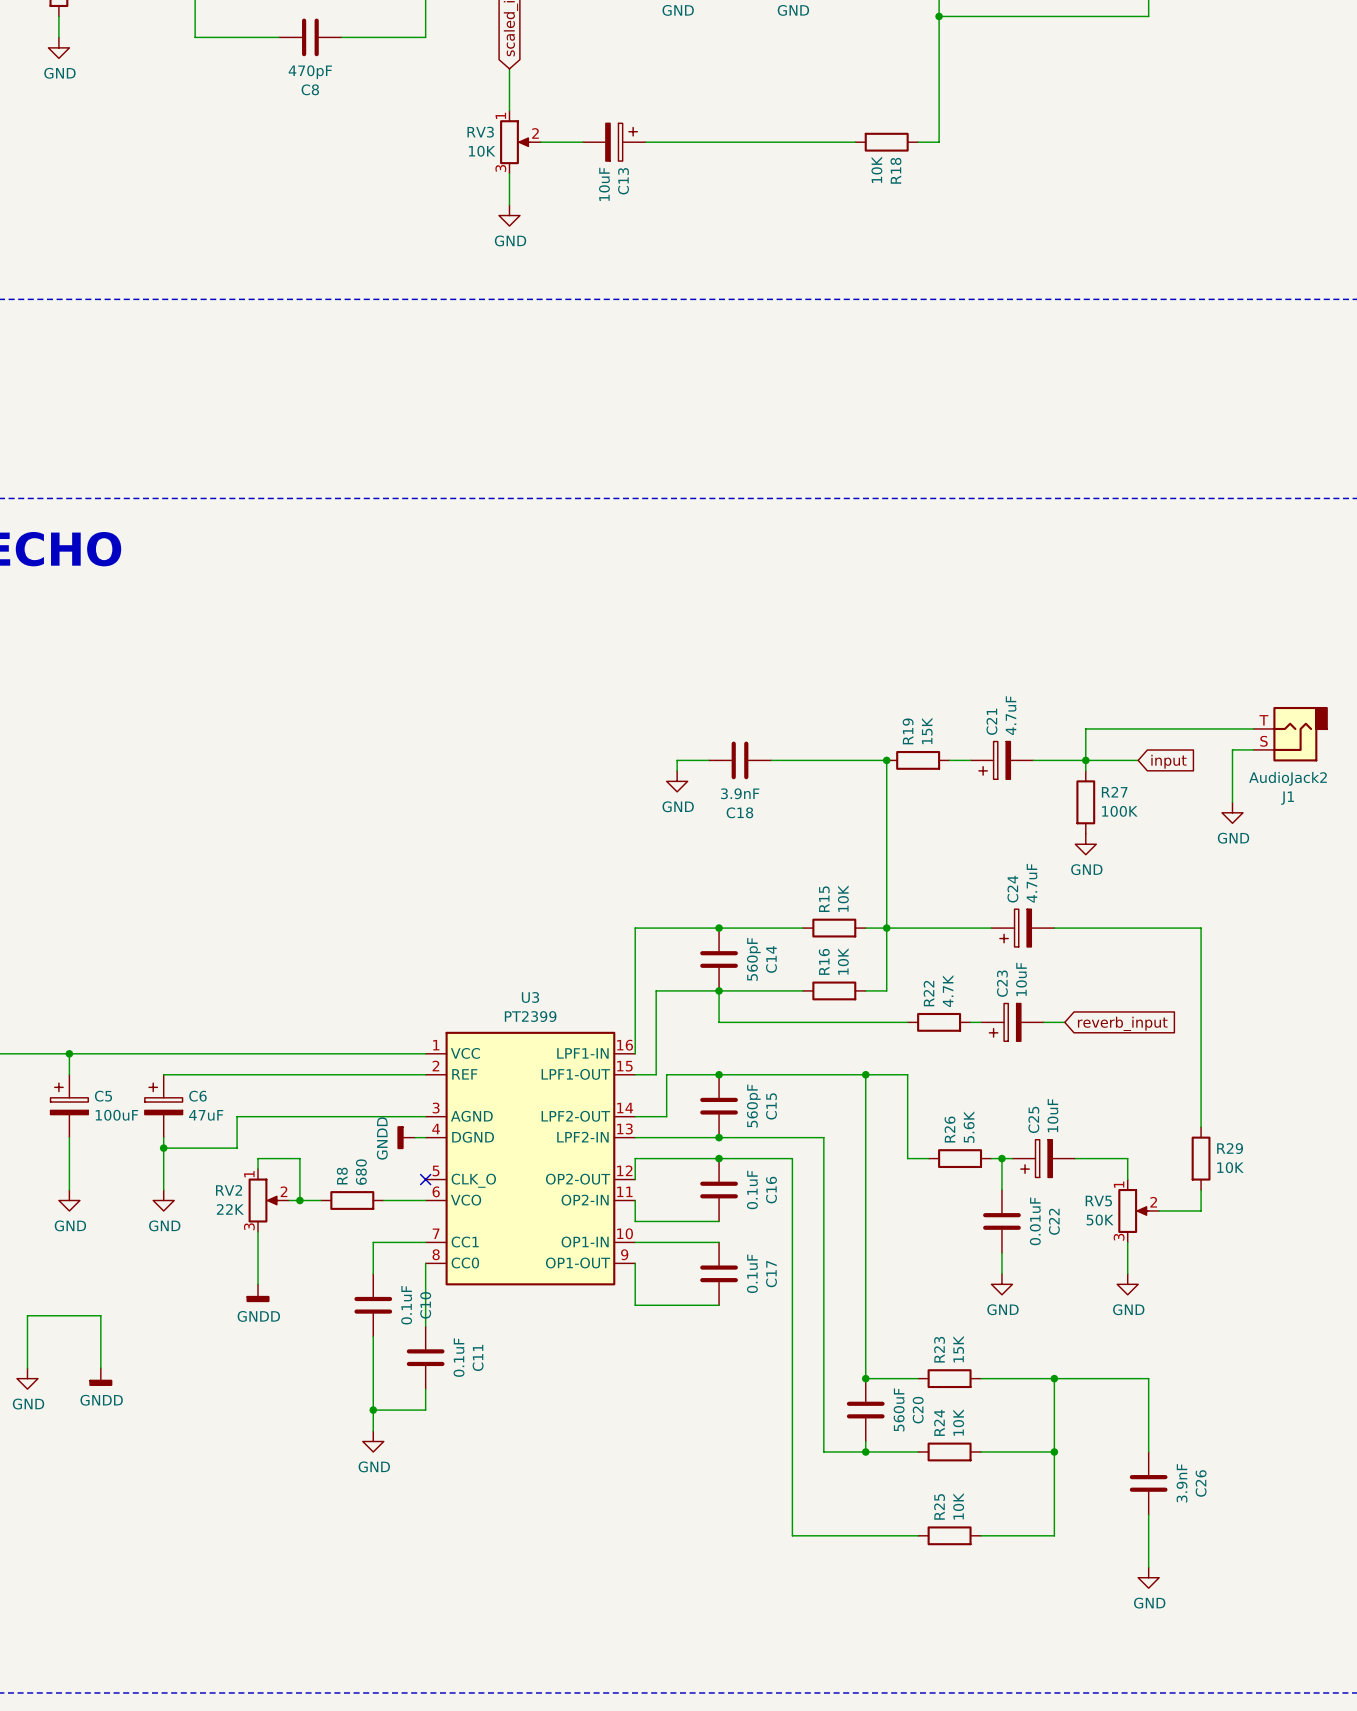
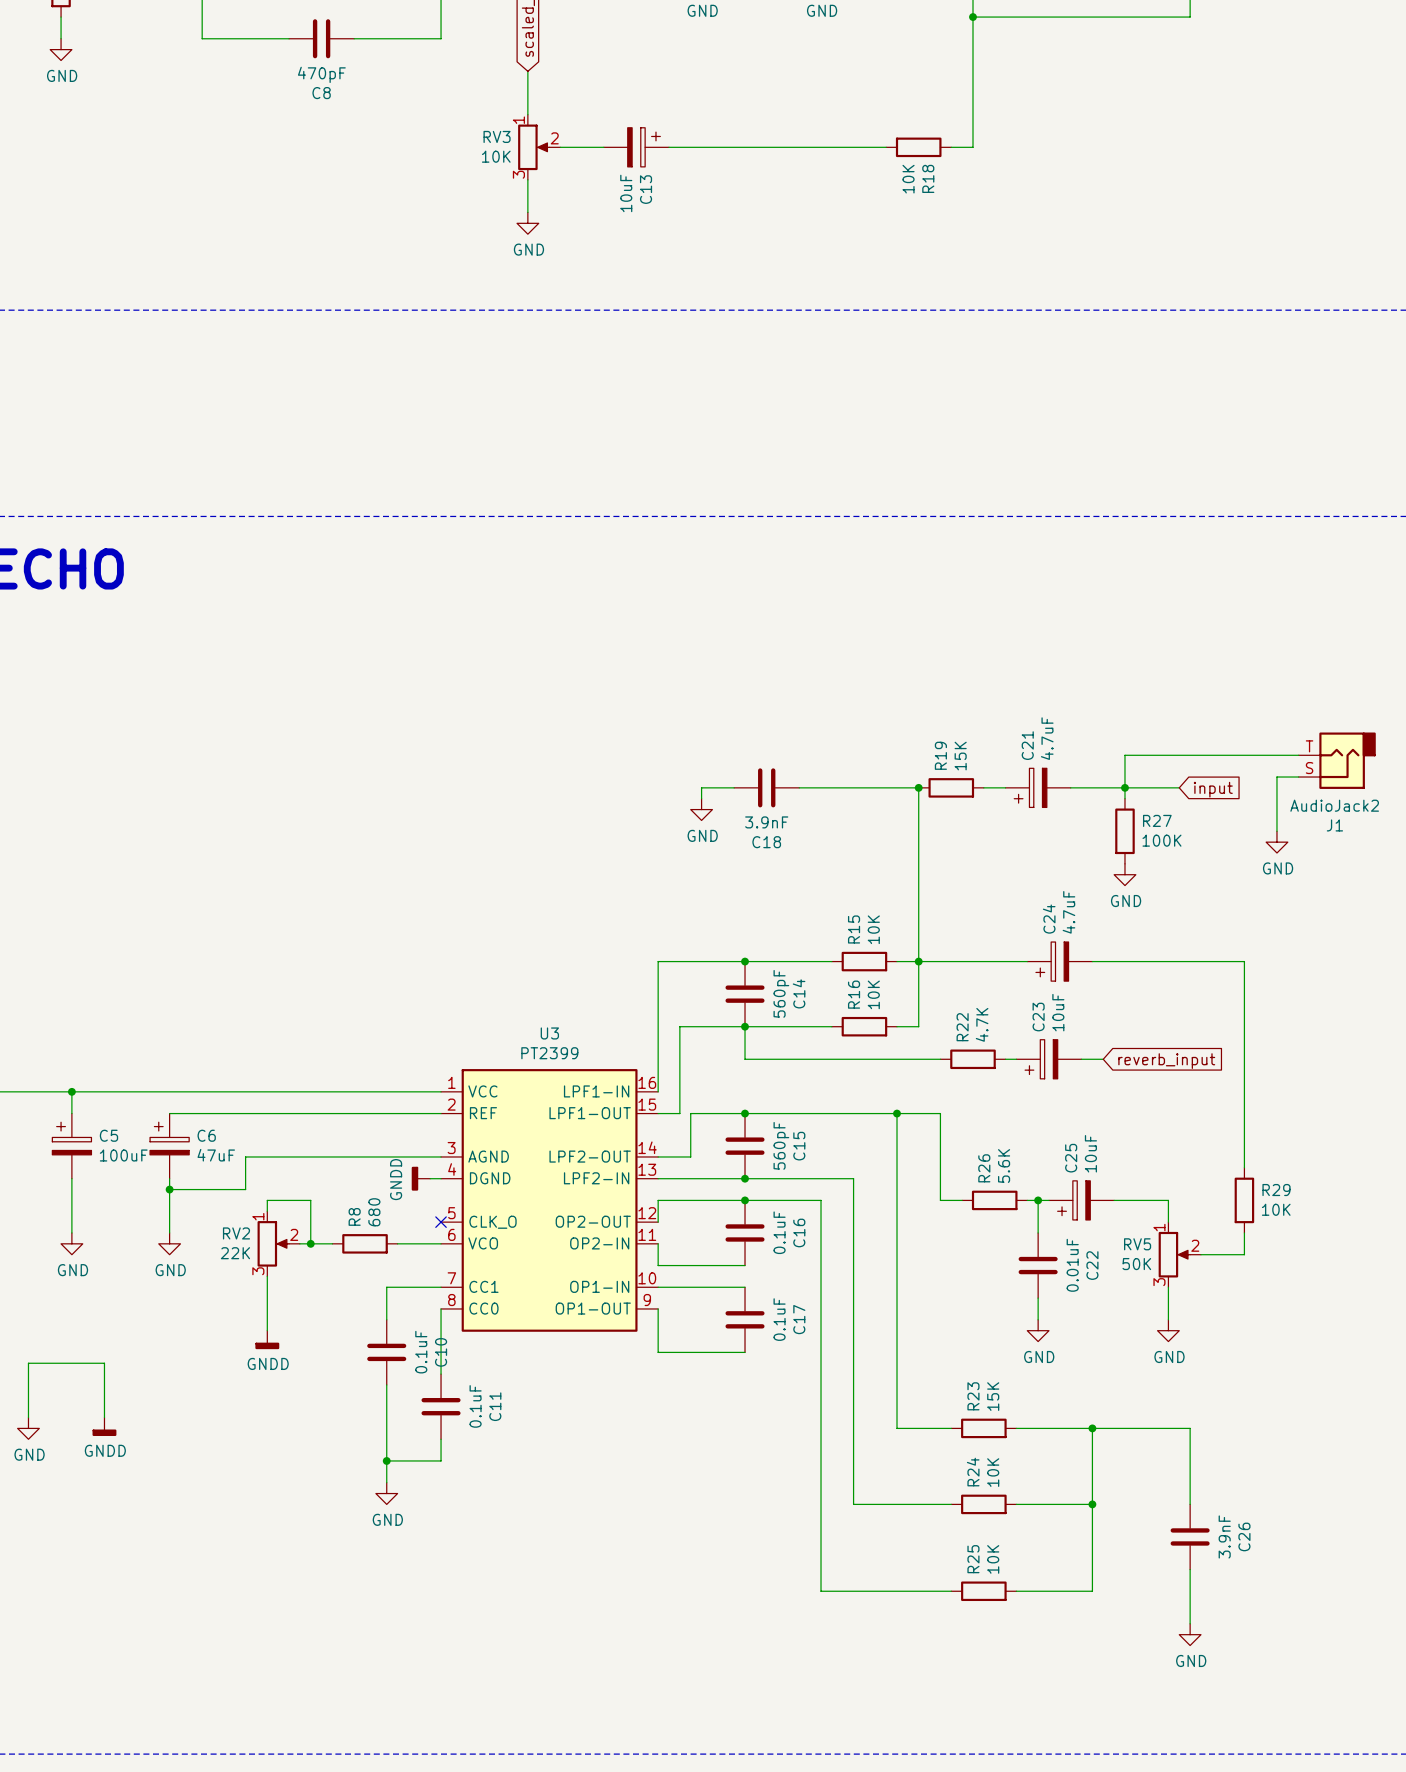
junction: (865, 1378) -> none
C20: 560uF (865, 1410) -> none
wire: (865, 1441) (865, 1451) -> none
junction: (865, 1451) -> none

